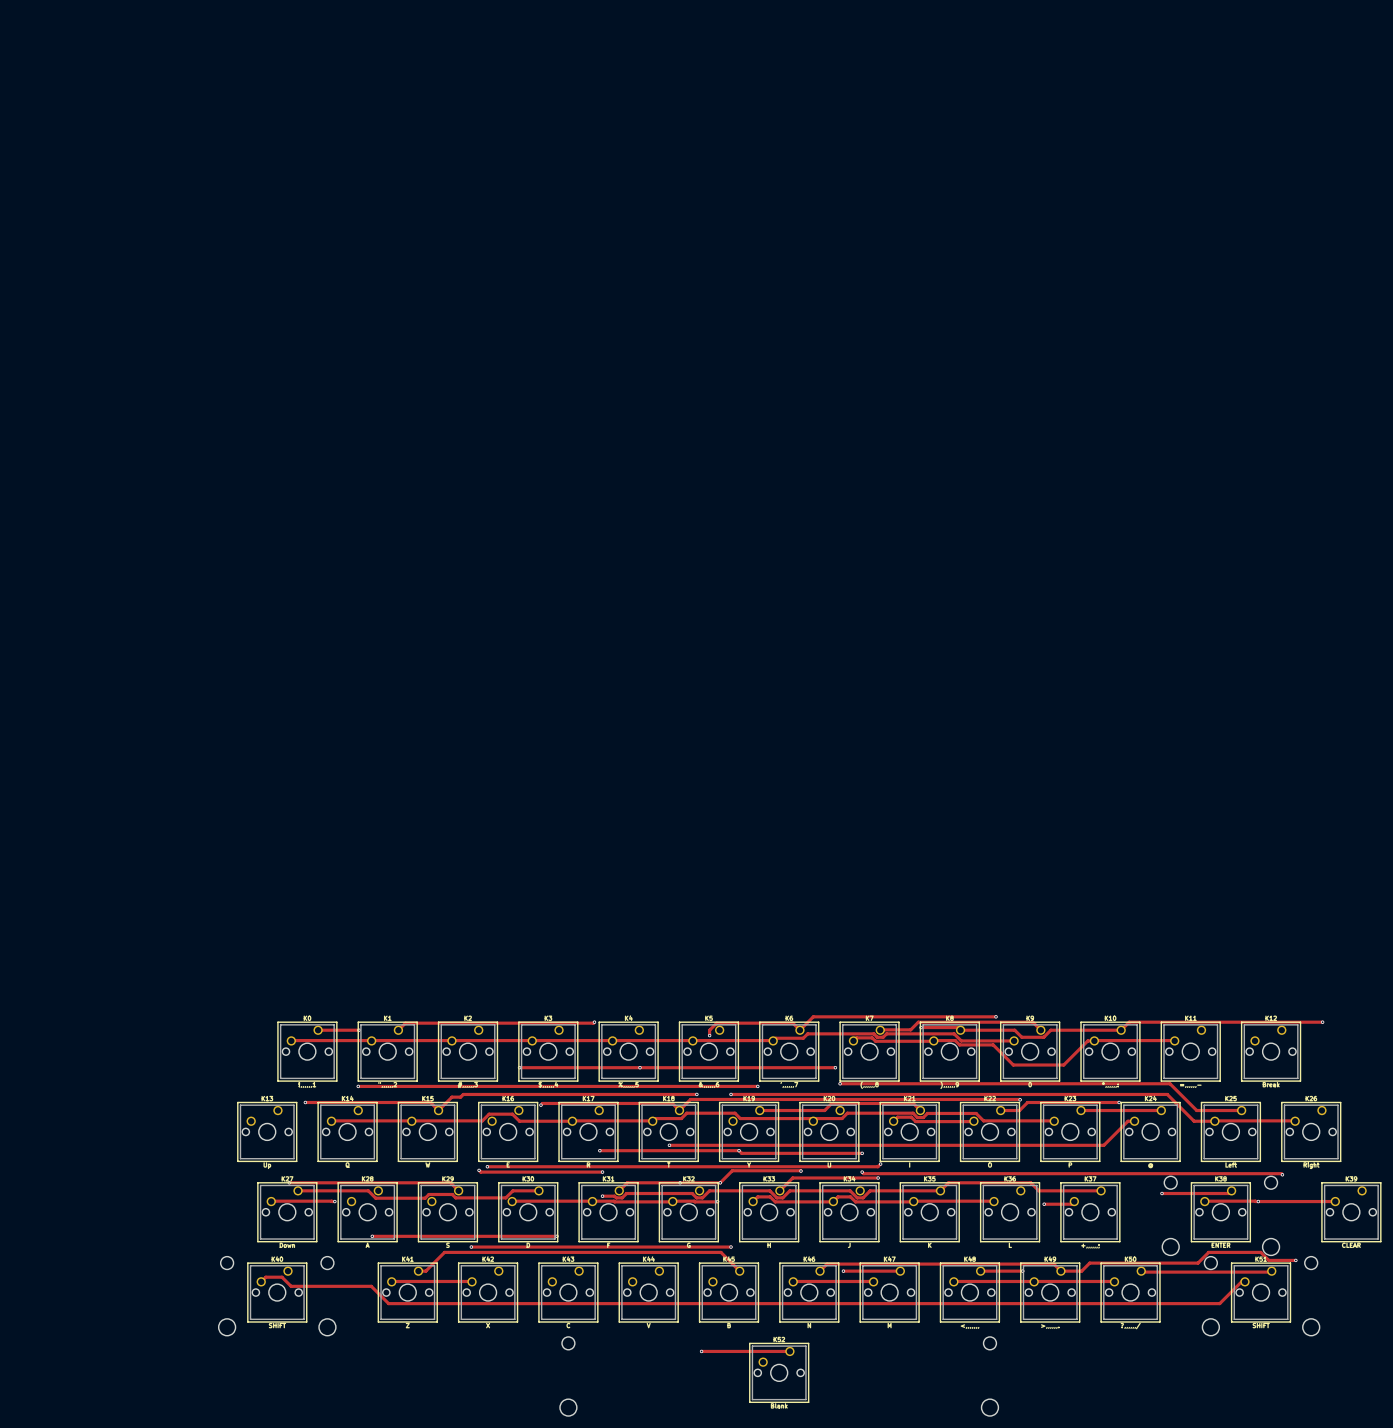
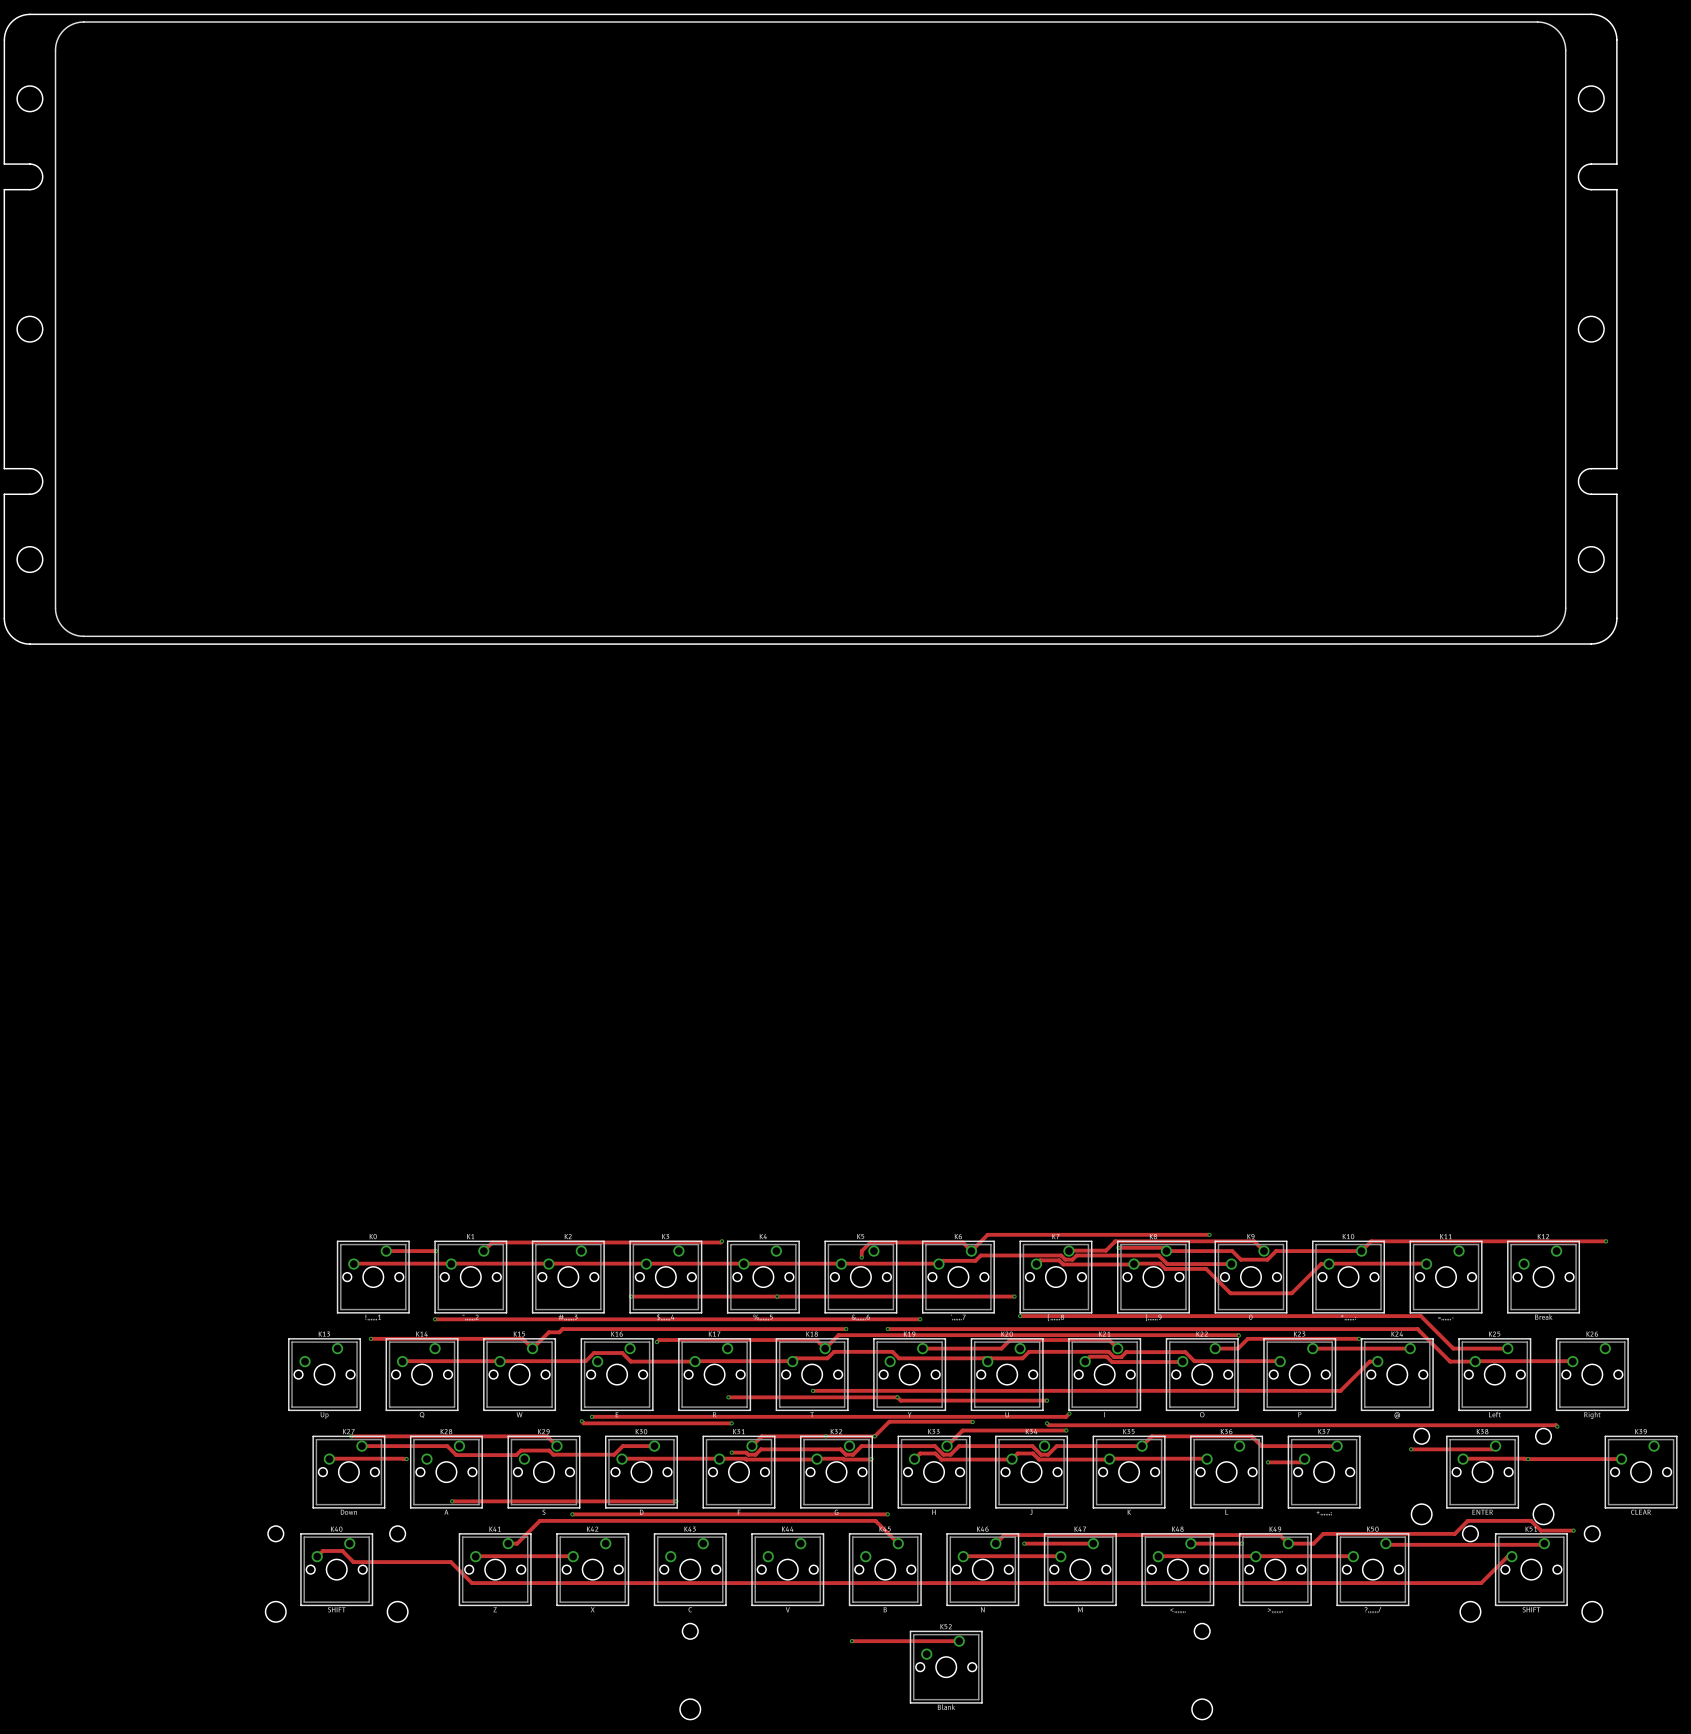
board edge: none -> (1591, 14) (21, 15) (9, 24) (4, 37) (4, 164) (33, 164) (40, 169) (42, 176) (40, 184) (33, 189) (4, 189) (4, 468) (33, 469) (40, 473) (42, 481) (40, 489) (33, 493) (4, 494) (5, 626) (16, 640) (29, 644) (1599, 642) (1611, 634) (1616, 621) (1616, 494) (1587, 493) (1581, 489) (1578, 481) (1581, 473) (1587, 469) (1616, 468) (1616, 189) (1587, 189) (1581, 184) (1578, 176) (1581, 169) (1587, 164) (1616, 164) (1616, 39) (1614, 28) (1609, 21) (1602, 16) (1591, 14)
line: none -> (83, 22) (1537, 22) (1548, 24) (1560, 34) (1565, 50) (1565, 608) (1563, 618) (1553, 631) (1537, 636) (83, 636) (72, 634) (60, 623) (55, 608) (55, 50) (57, 39) (63, 30) (72, 24) (83, 22)
round board edge: none -> [16, 85, 43, 112]
round board edge: none -> [1578, 85, 1605, 112]
round board edge: none -> [16, 316, 43, 343]
round board edge: none -> [1578, 316, 1605, 343]
round board edge: none -> [16, 546, 43, 573]
round board edge: none -> [1578, 546, 1605, 573]

